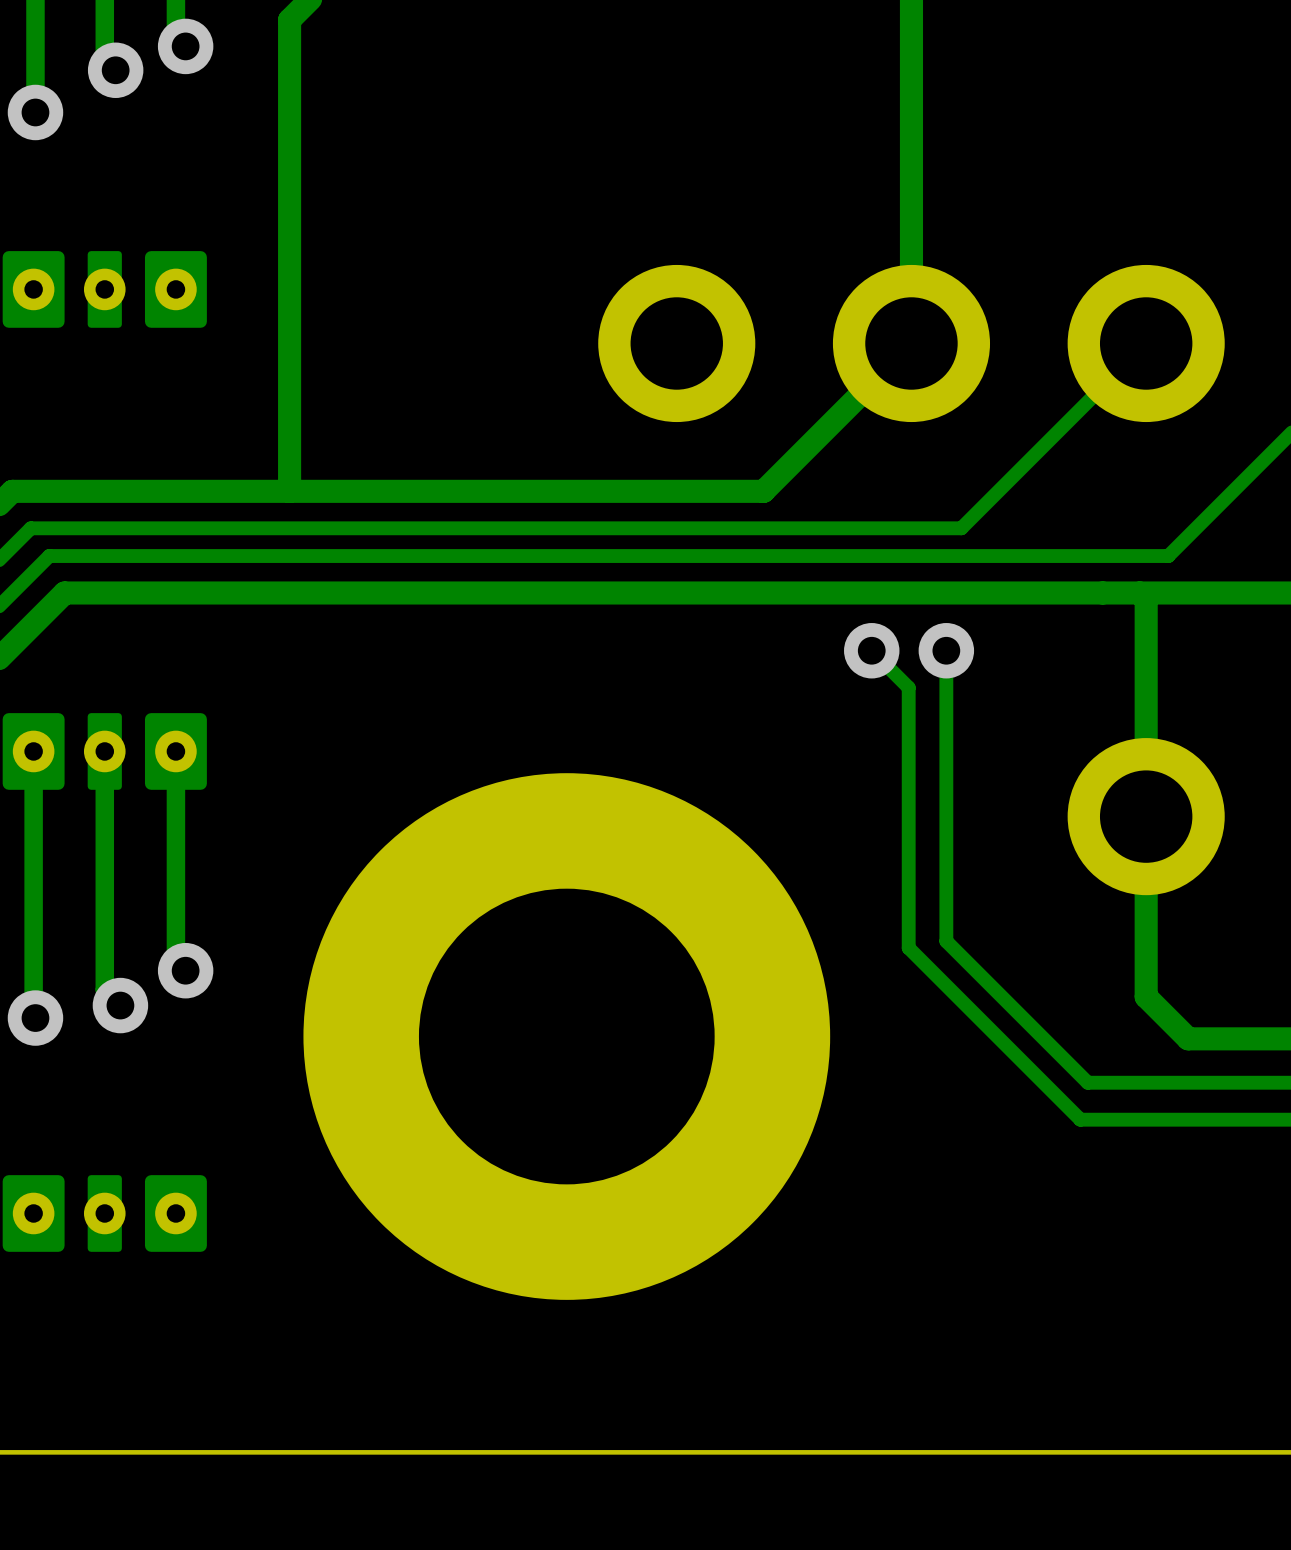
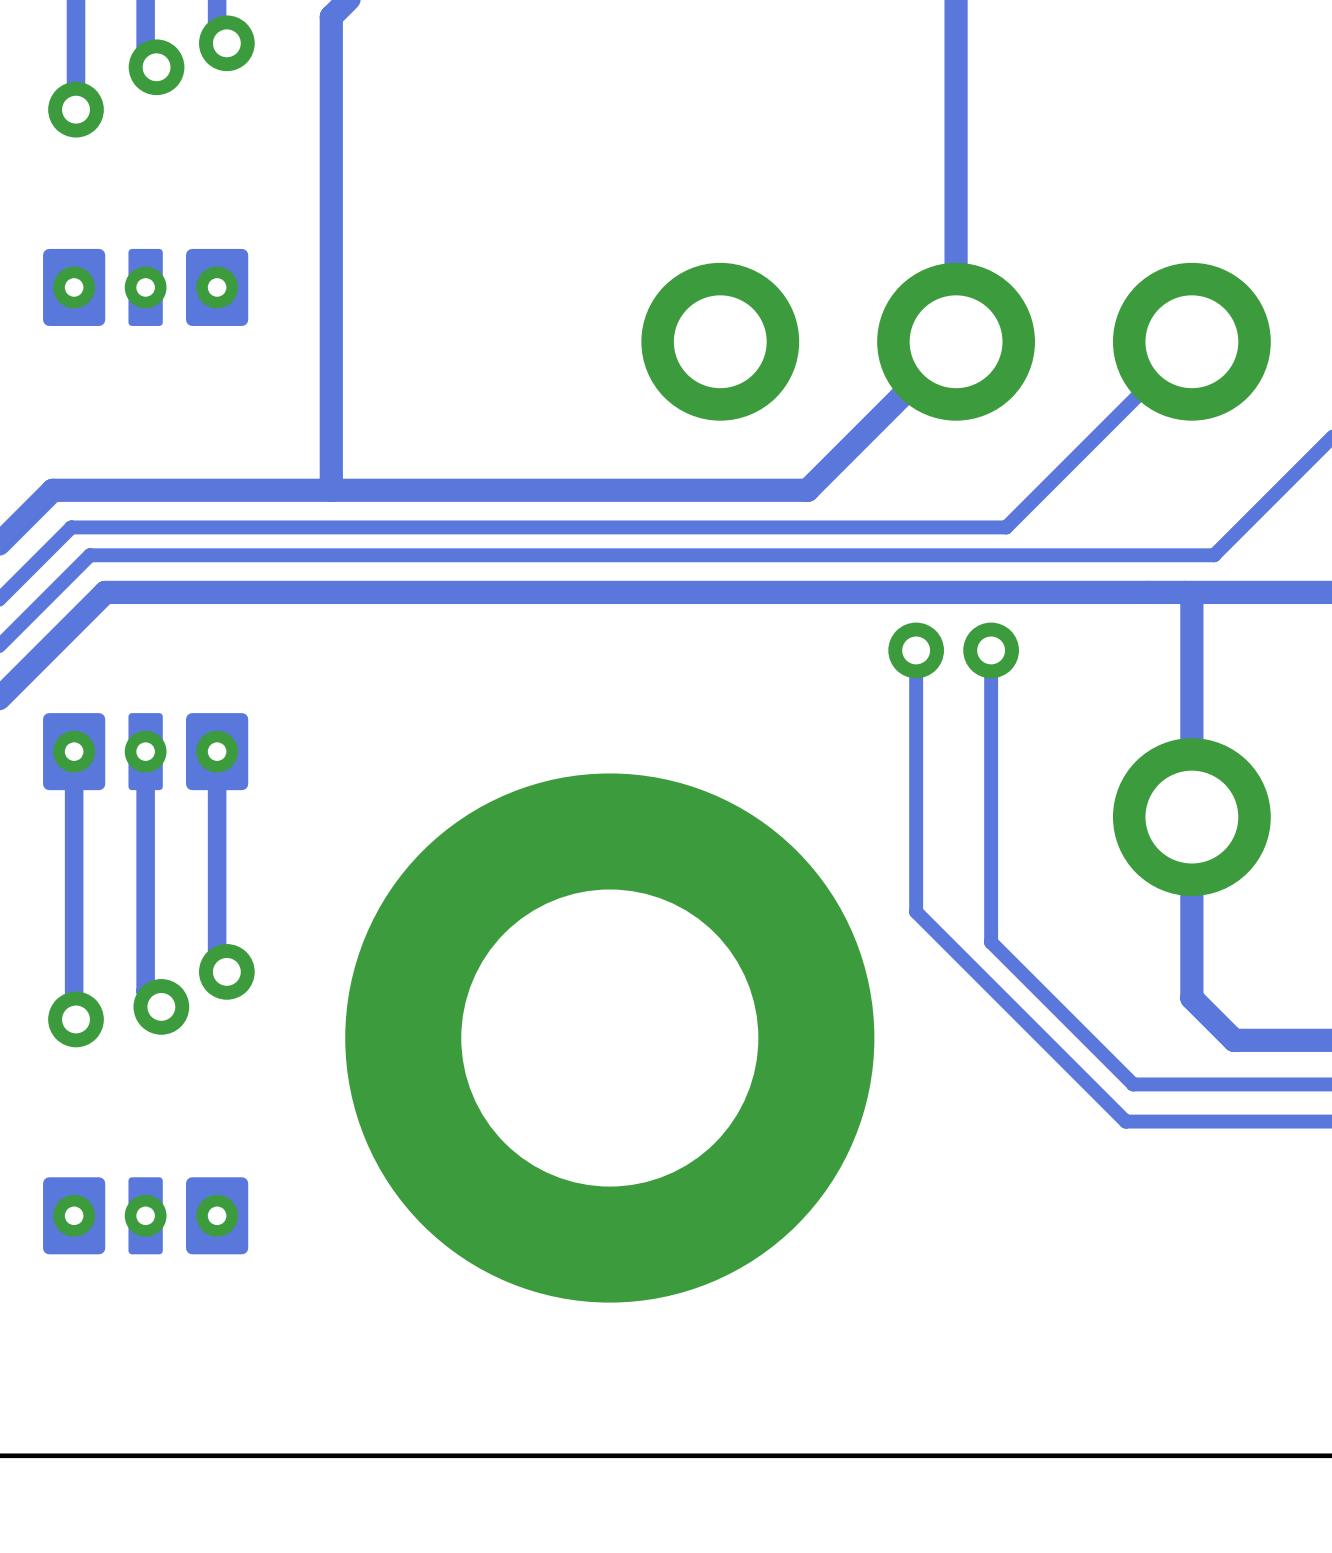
track: (871, 650) (908, 687) (908, 947) -> (916, 650) (916, 911) (953, 949)

